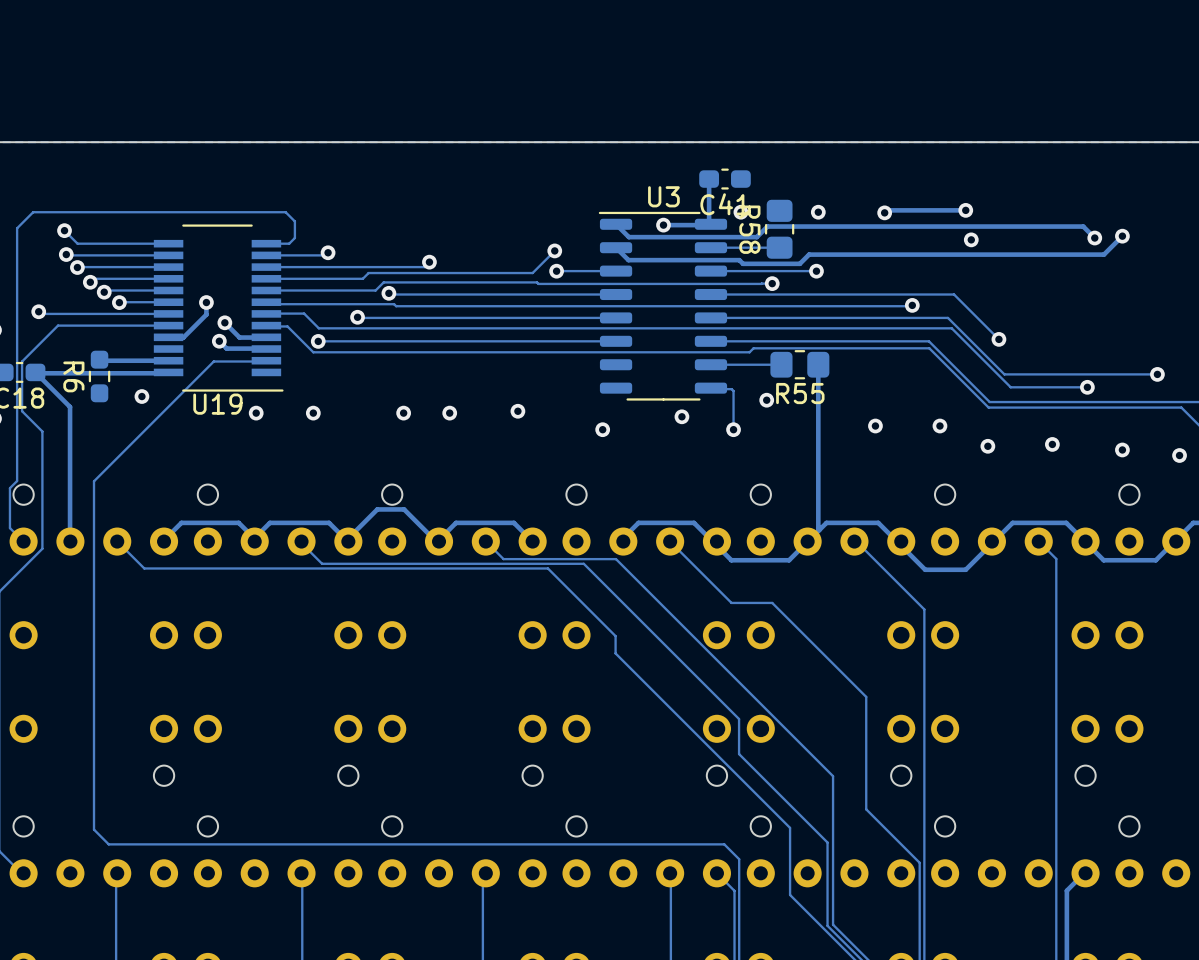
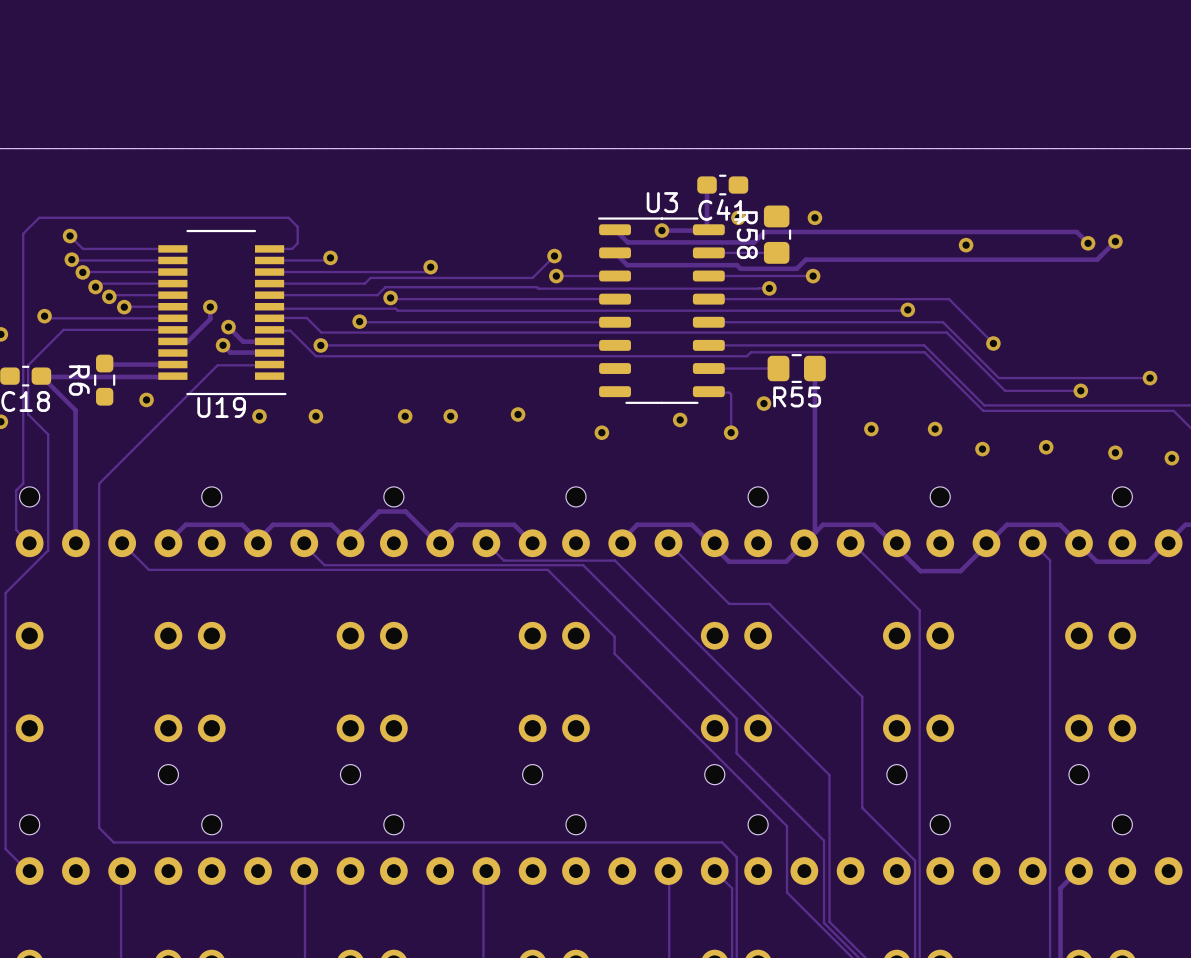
track: (965, 210) (887, 210) (884, 212) -> none
via: (965, 210) -> none
via: (884, 212) -> none

